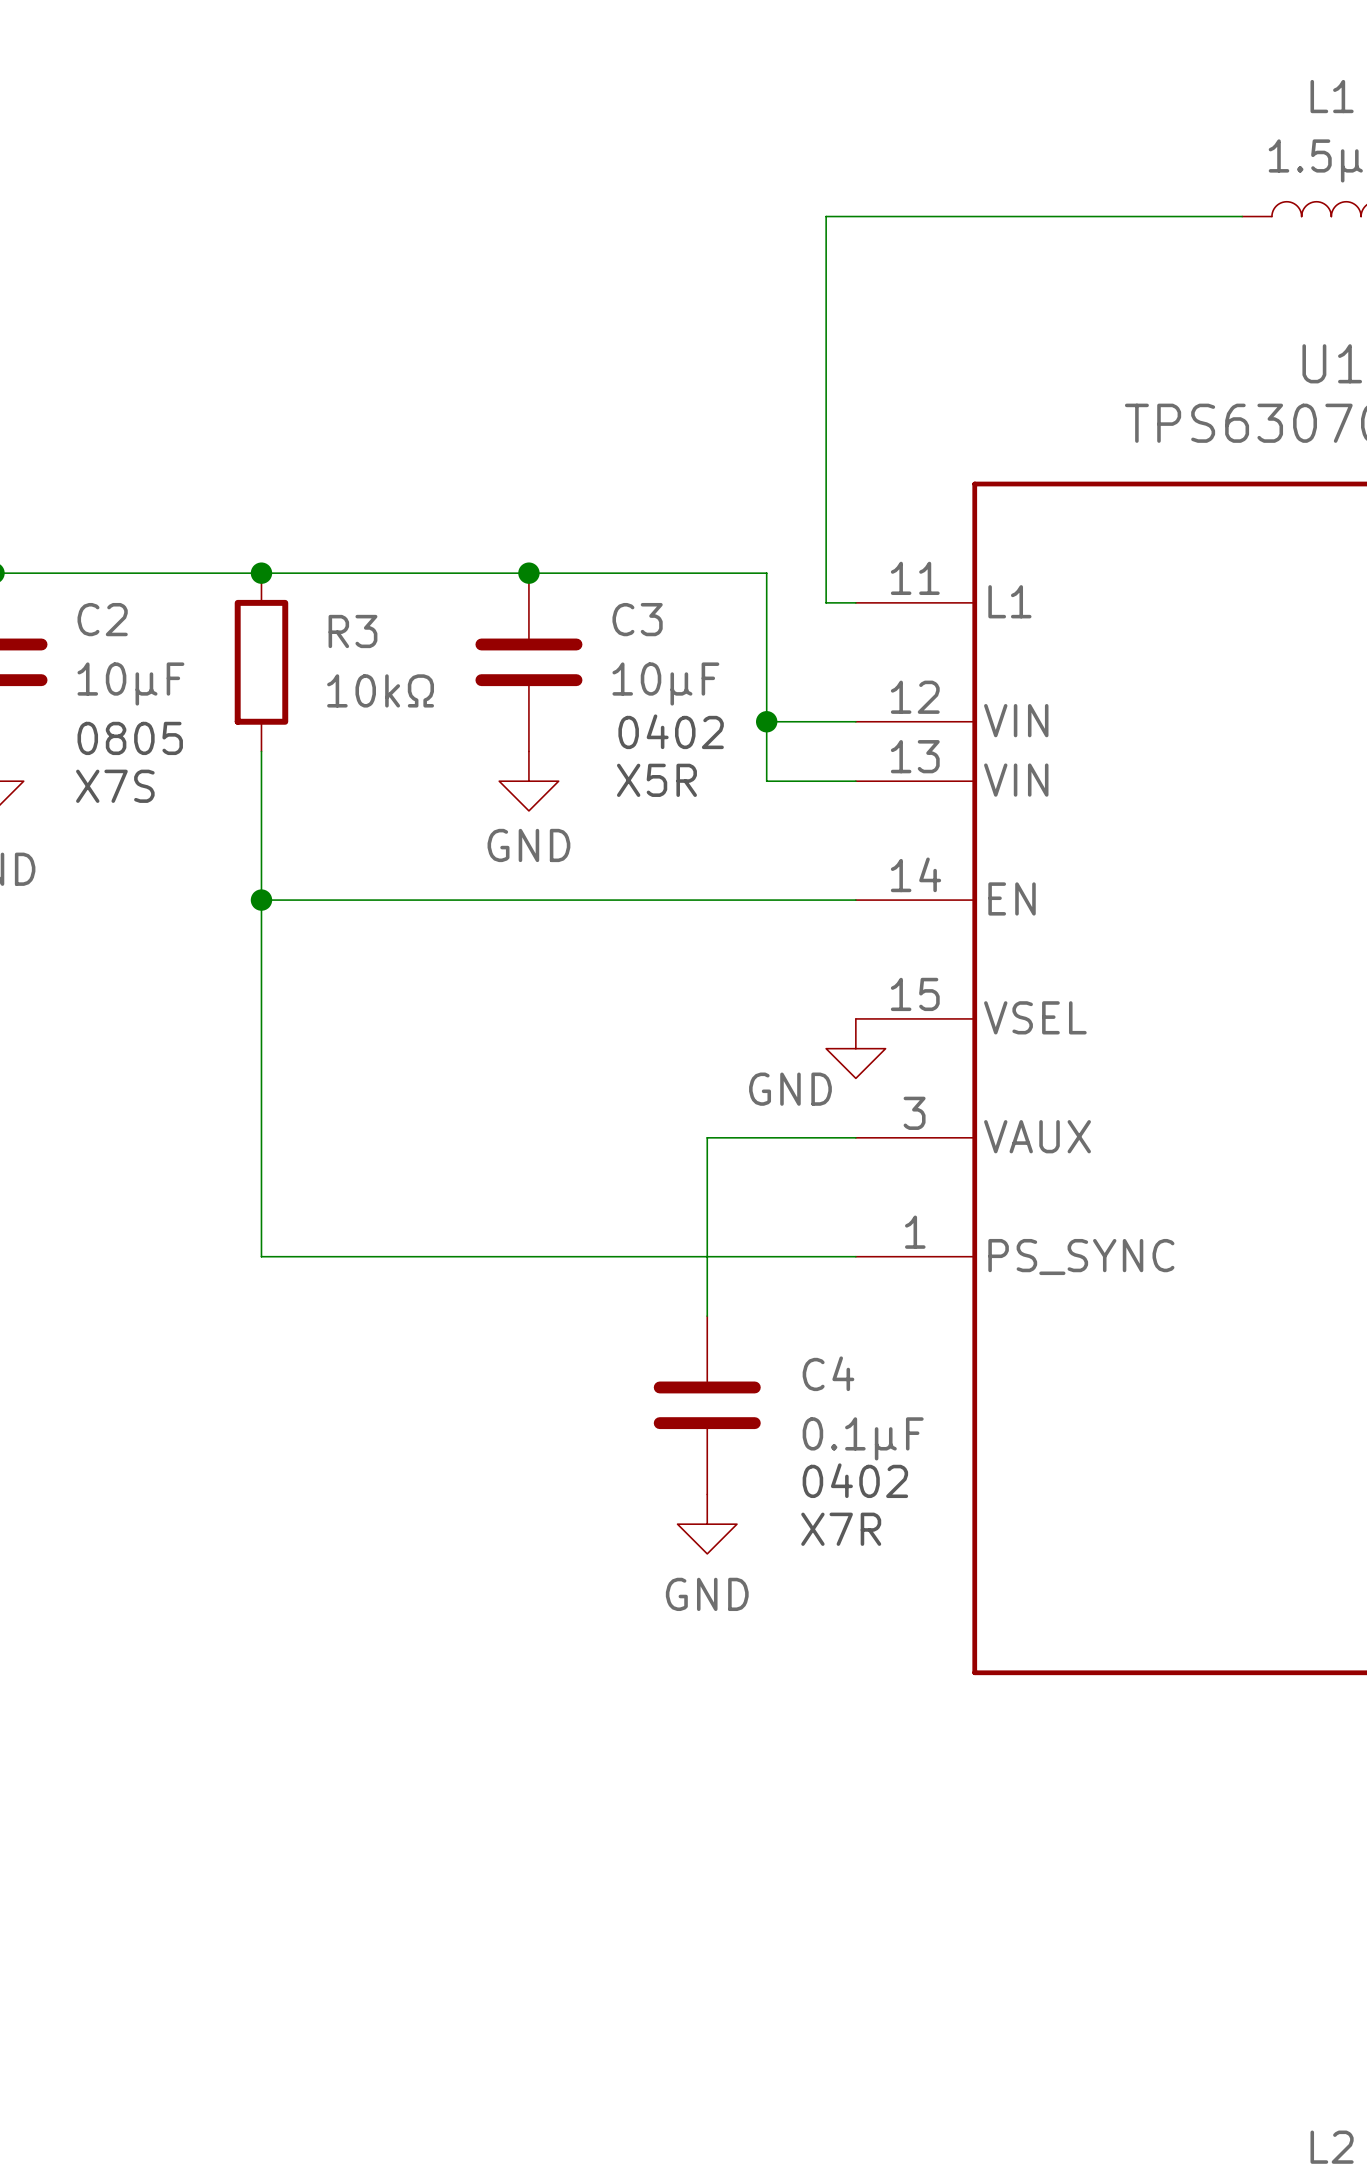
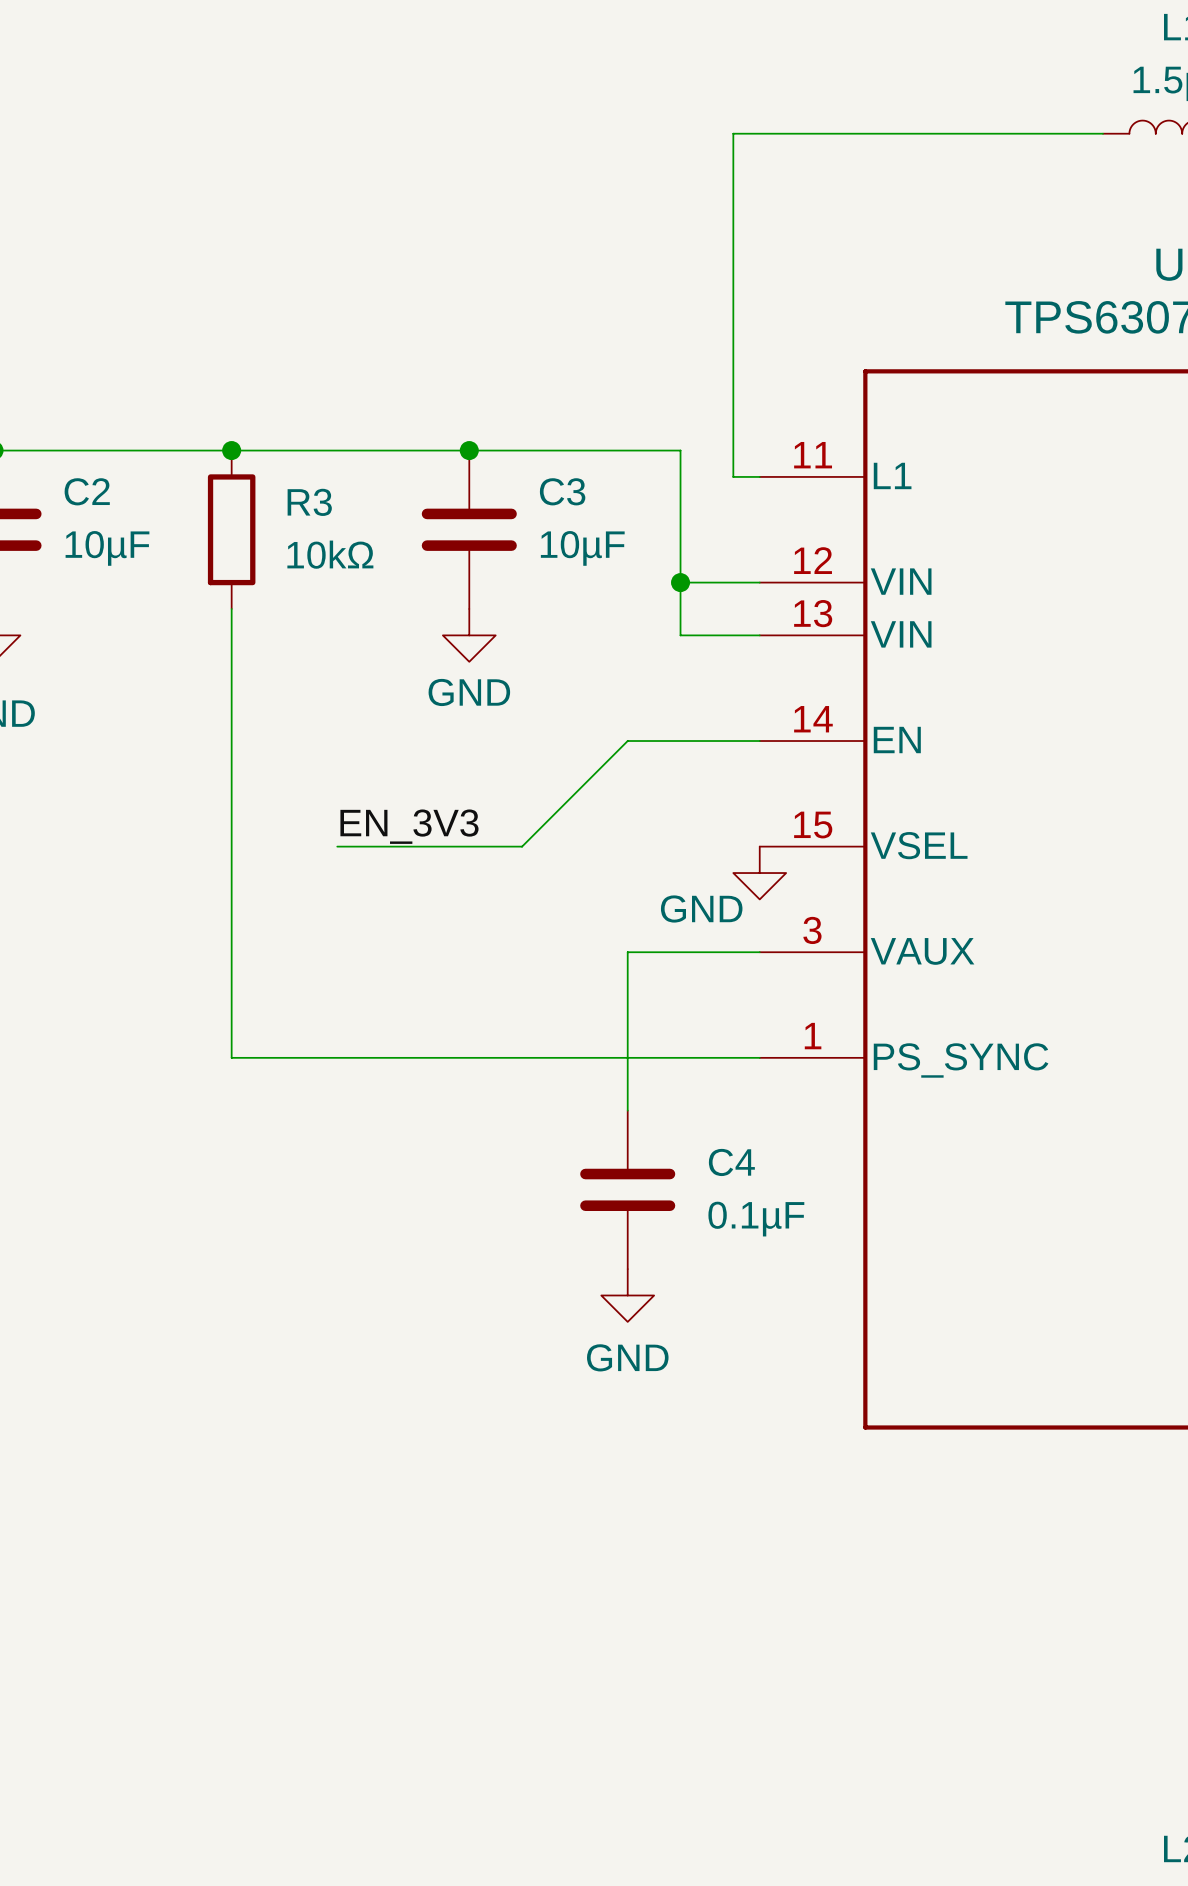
text: 0402 (671, 731) -> none
text: 0805 (130, 738) -> none
text: X5R (656, 780) -> none
text: X7S (115, 786) -> none
wire: (261, 900) (707, 900) -> (337, 846) (522, 846) (627, 741)
junction: (261, 900) -> none
label: none -> EN_3V3 (409, 826)
text: 0402 (855, 1480) -> none
text: X7R (841, 1529) -> none

